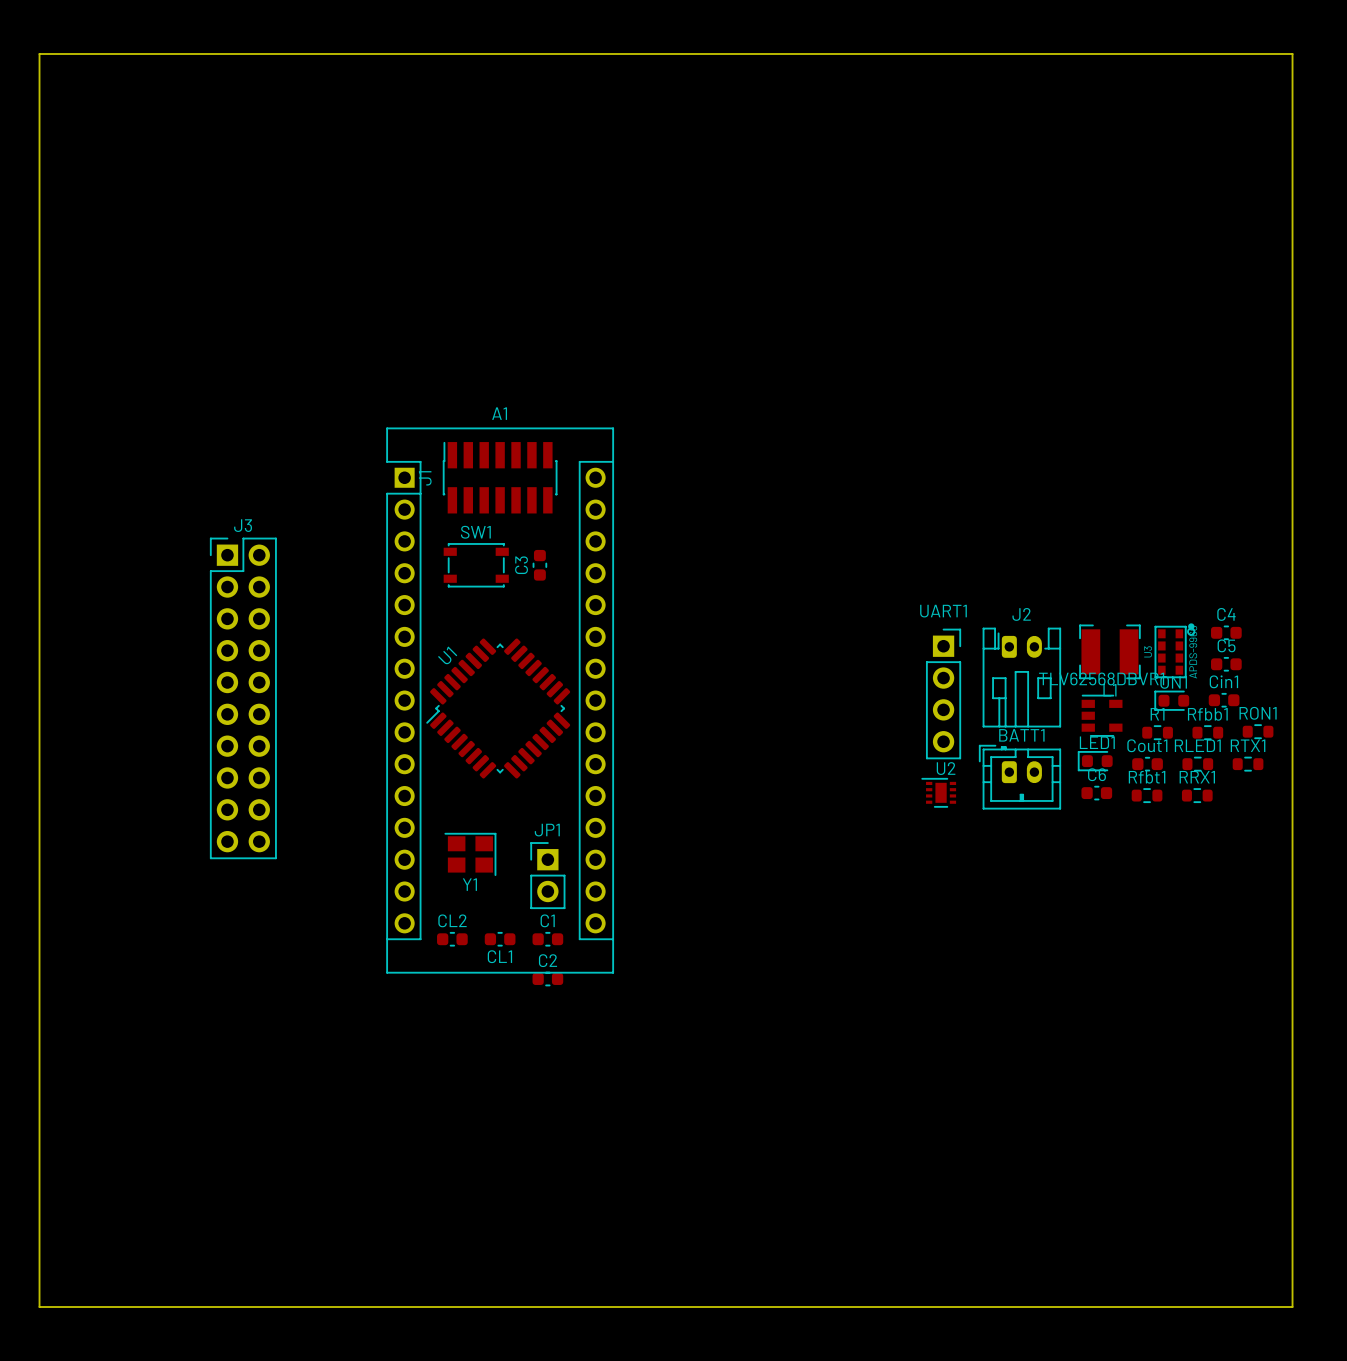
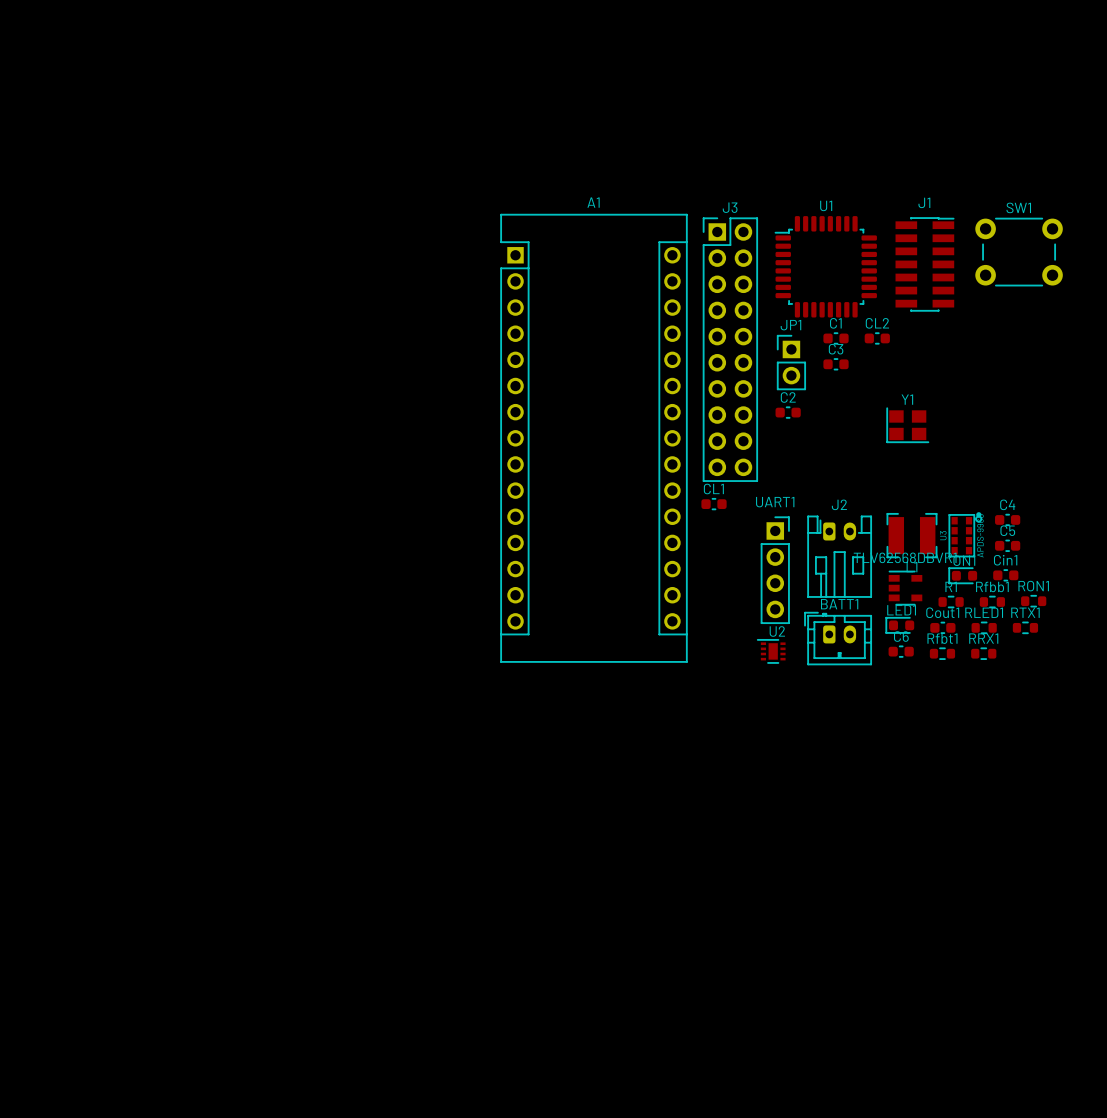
board edge: (39, 53) (1292, 53) (1292, 1307) (39, 1307) (39, 53) -> none
J1 rotation: 0° (500, 477) -> 90° clockwise (924, 264)
J1 position: (500, 477) -> (924, 264)
SW1 footprint: [443, 543, 509, 588] -> [975, 217, 1063, 287]
C3 rotation: 0° (539, 565) -> 90° clockwise (836, 364)
C3 position: (539, 565) -> (836, 364)
J3 position: (243, 698) -> (730, 349)
A1 position: (500, 700) -> (593, 438)
U1 rotation: 0° (498, 708) -> 45° clockwise (825, 266)
U1 position: (498, 708) -> (825, 266)
Y1 rotation: 0° (470, 854) -> 180° (907, 425)
Y1 position: (470, 854) -> (907, 425)
JP1 position: (547, 875) -> (791, 362)
CL2 position: (452, 939) -> (877, 338)
CL1 position: (500, 939) -> (714, 504)
C1 position: (547, 939) -> (836, 338)
CL1 name position: CL1 (499, 956) -> CL1 (713, 489)
C2 position: (547, 979) -> (788, 412)

